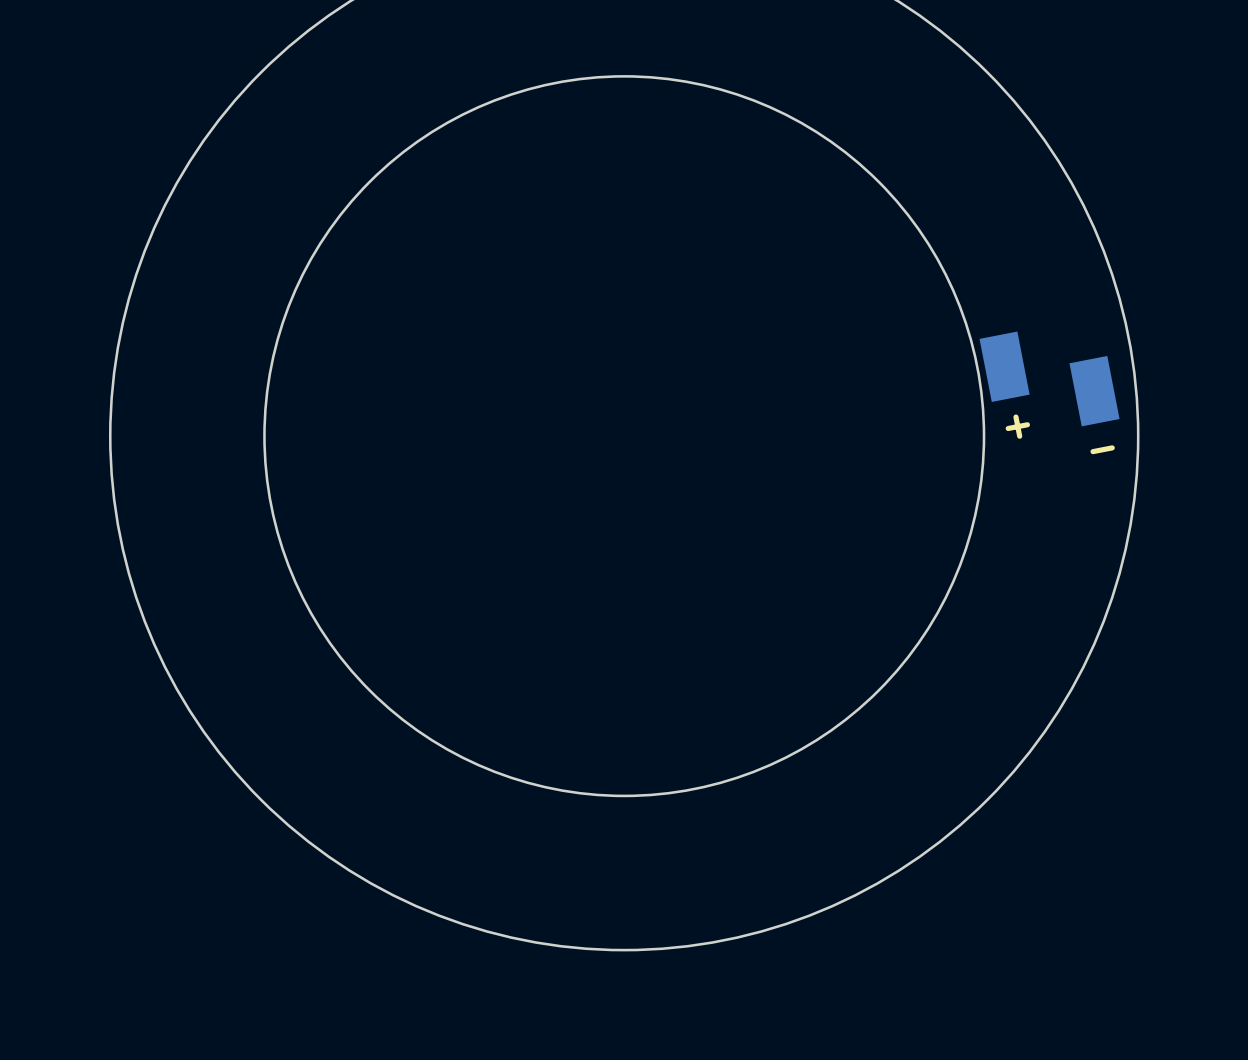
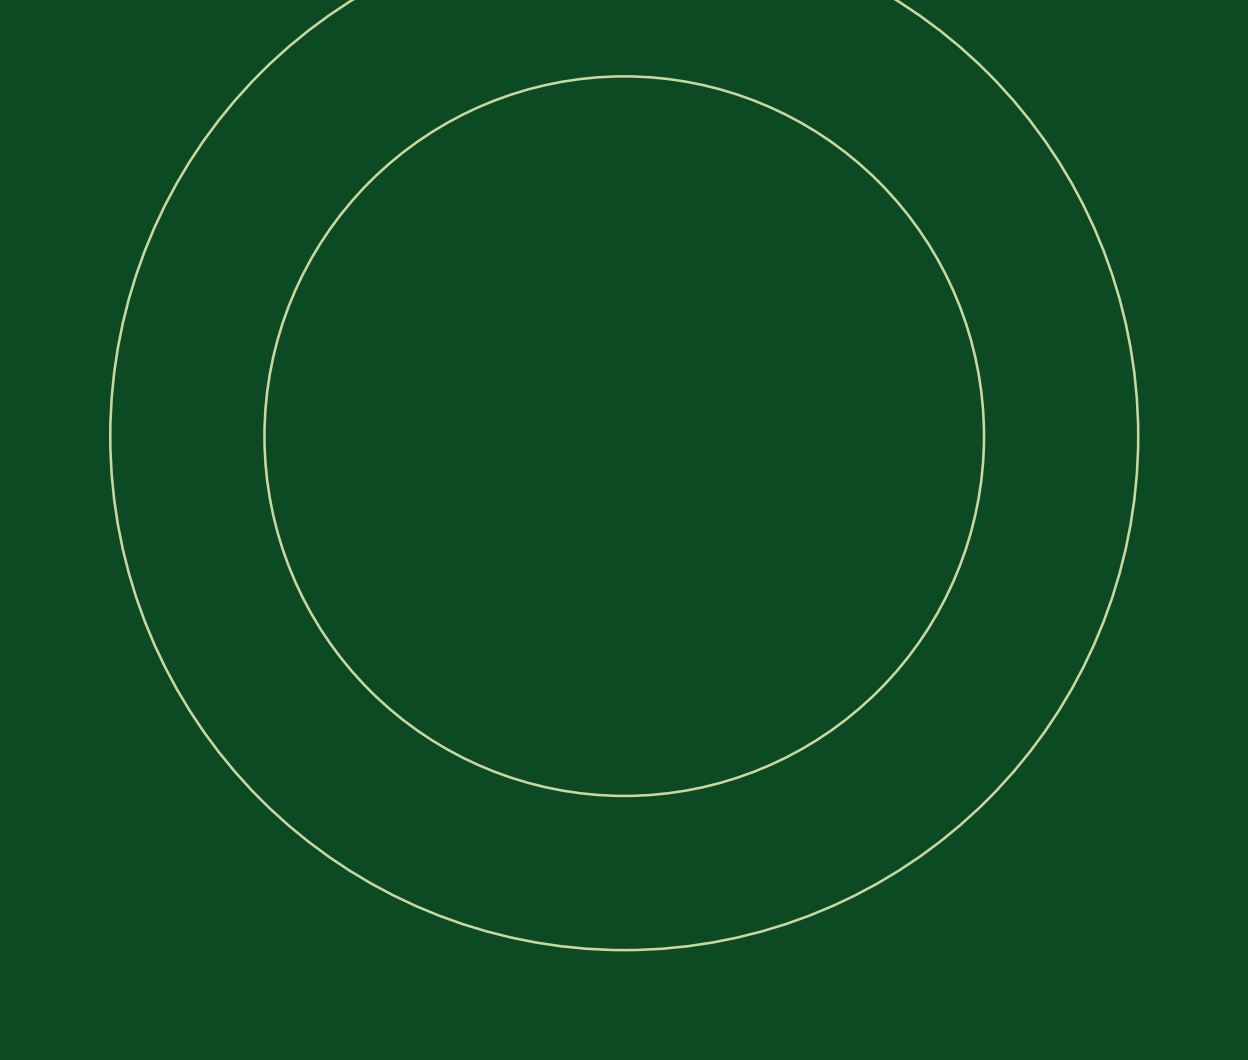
part: + (1004, 366) -> none
part: - (1094, 391) -> none

